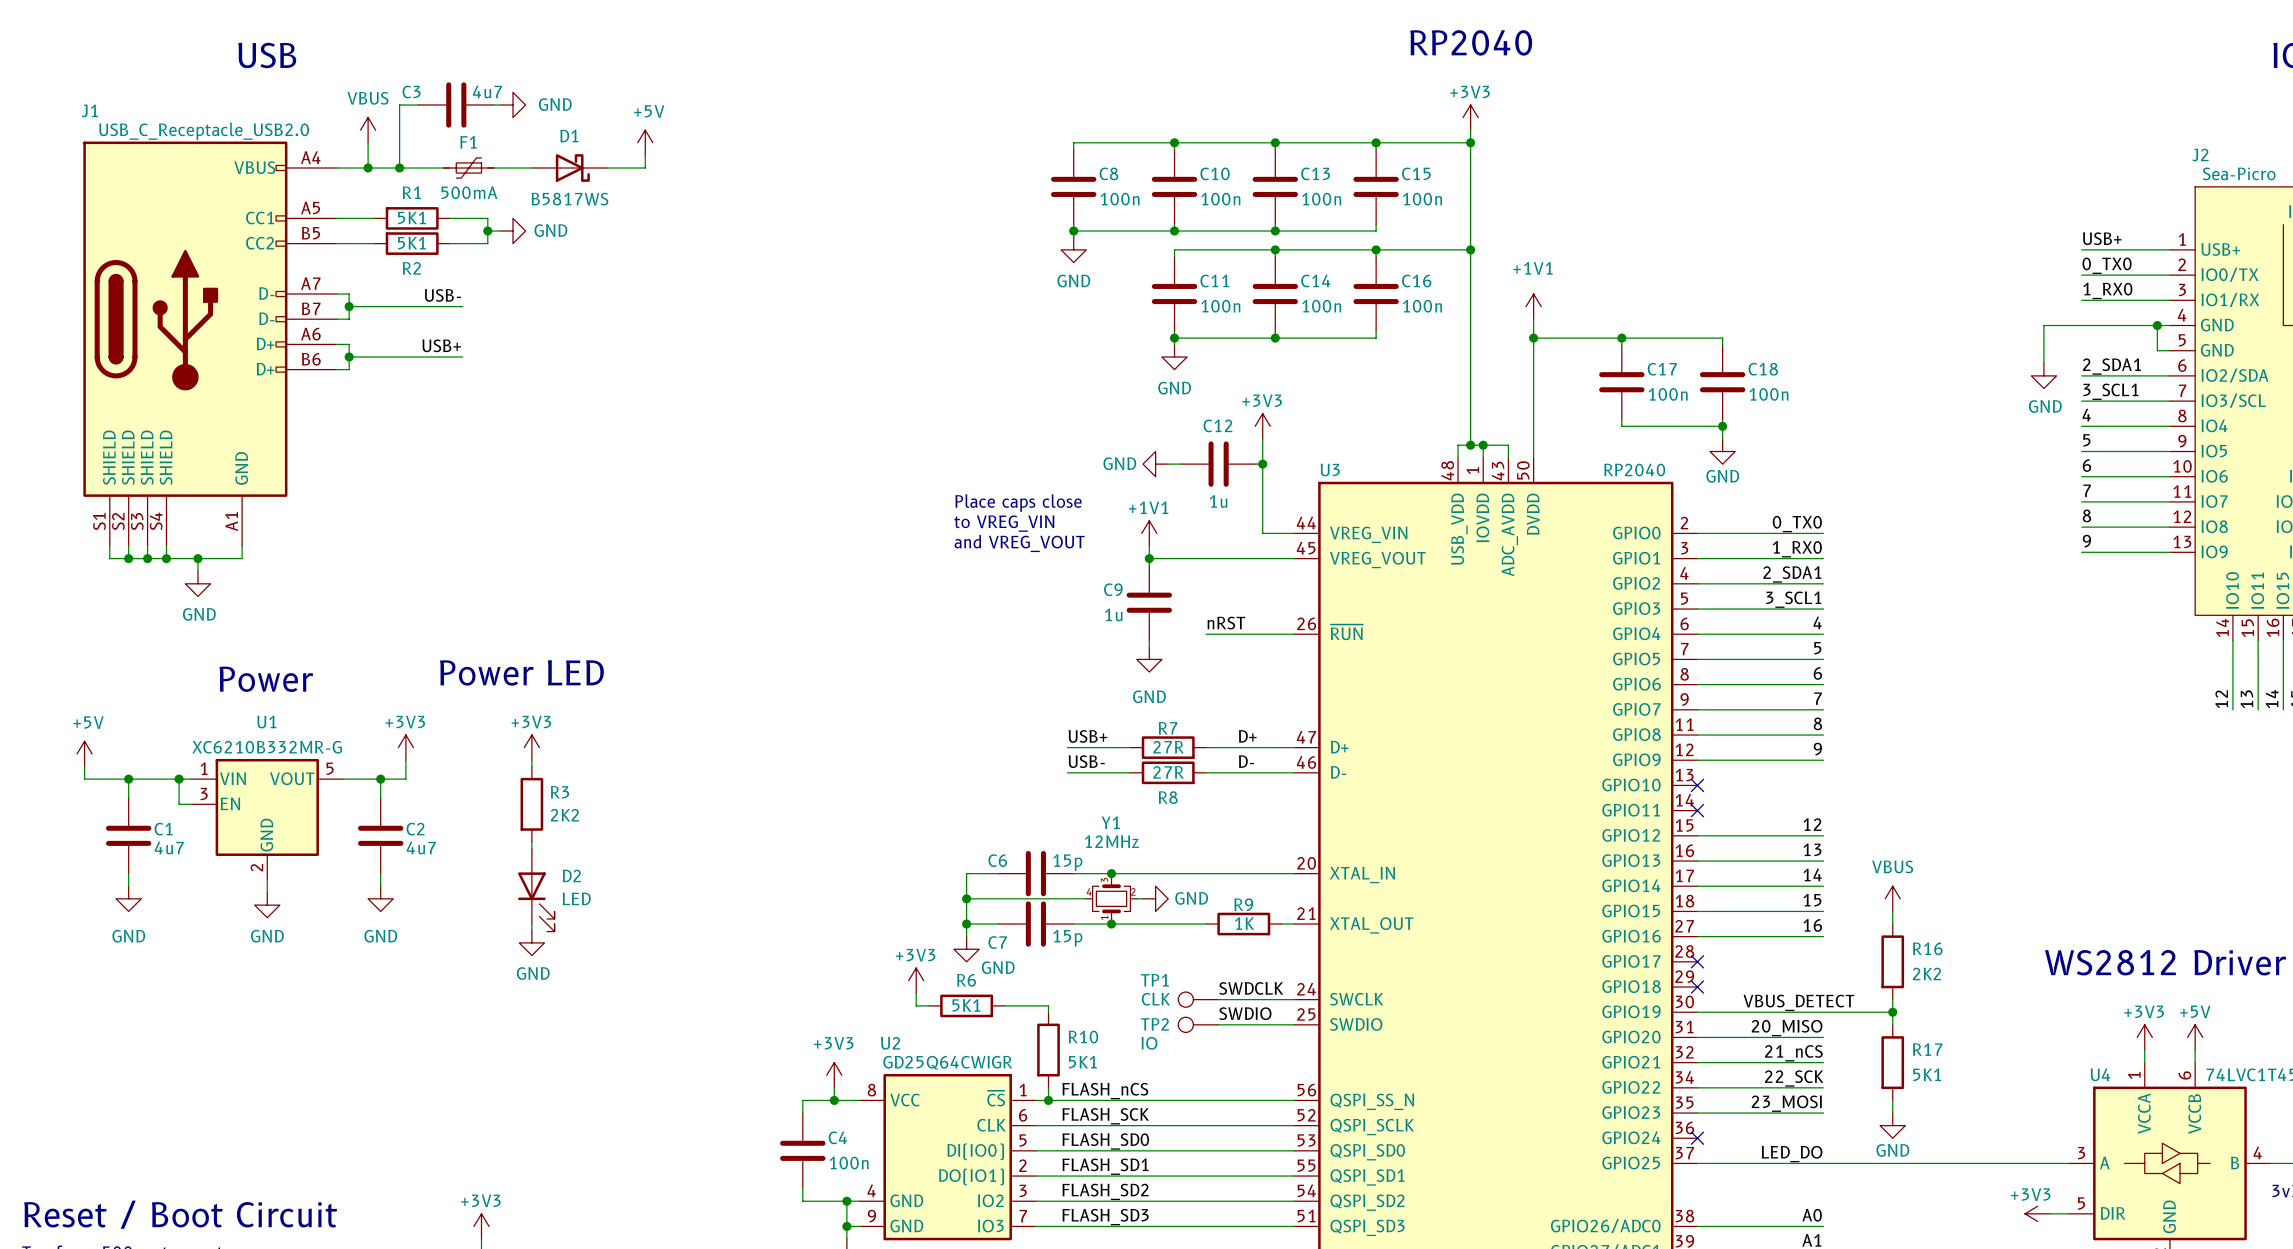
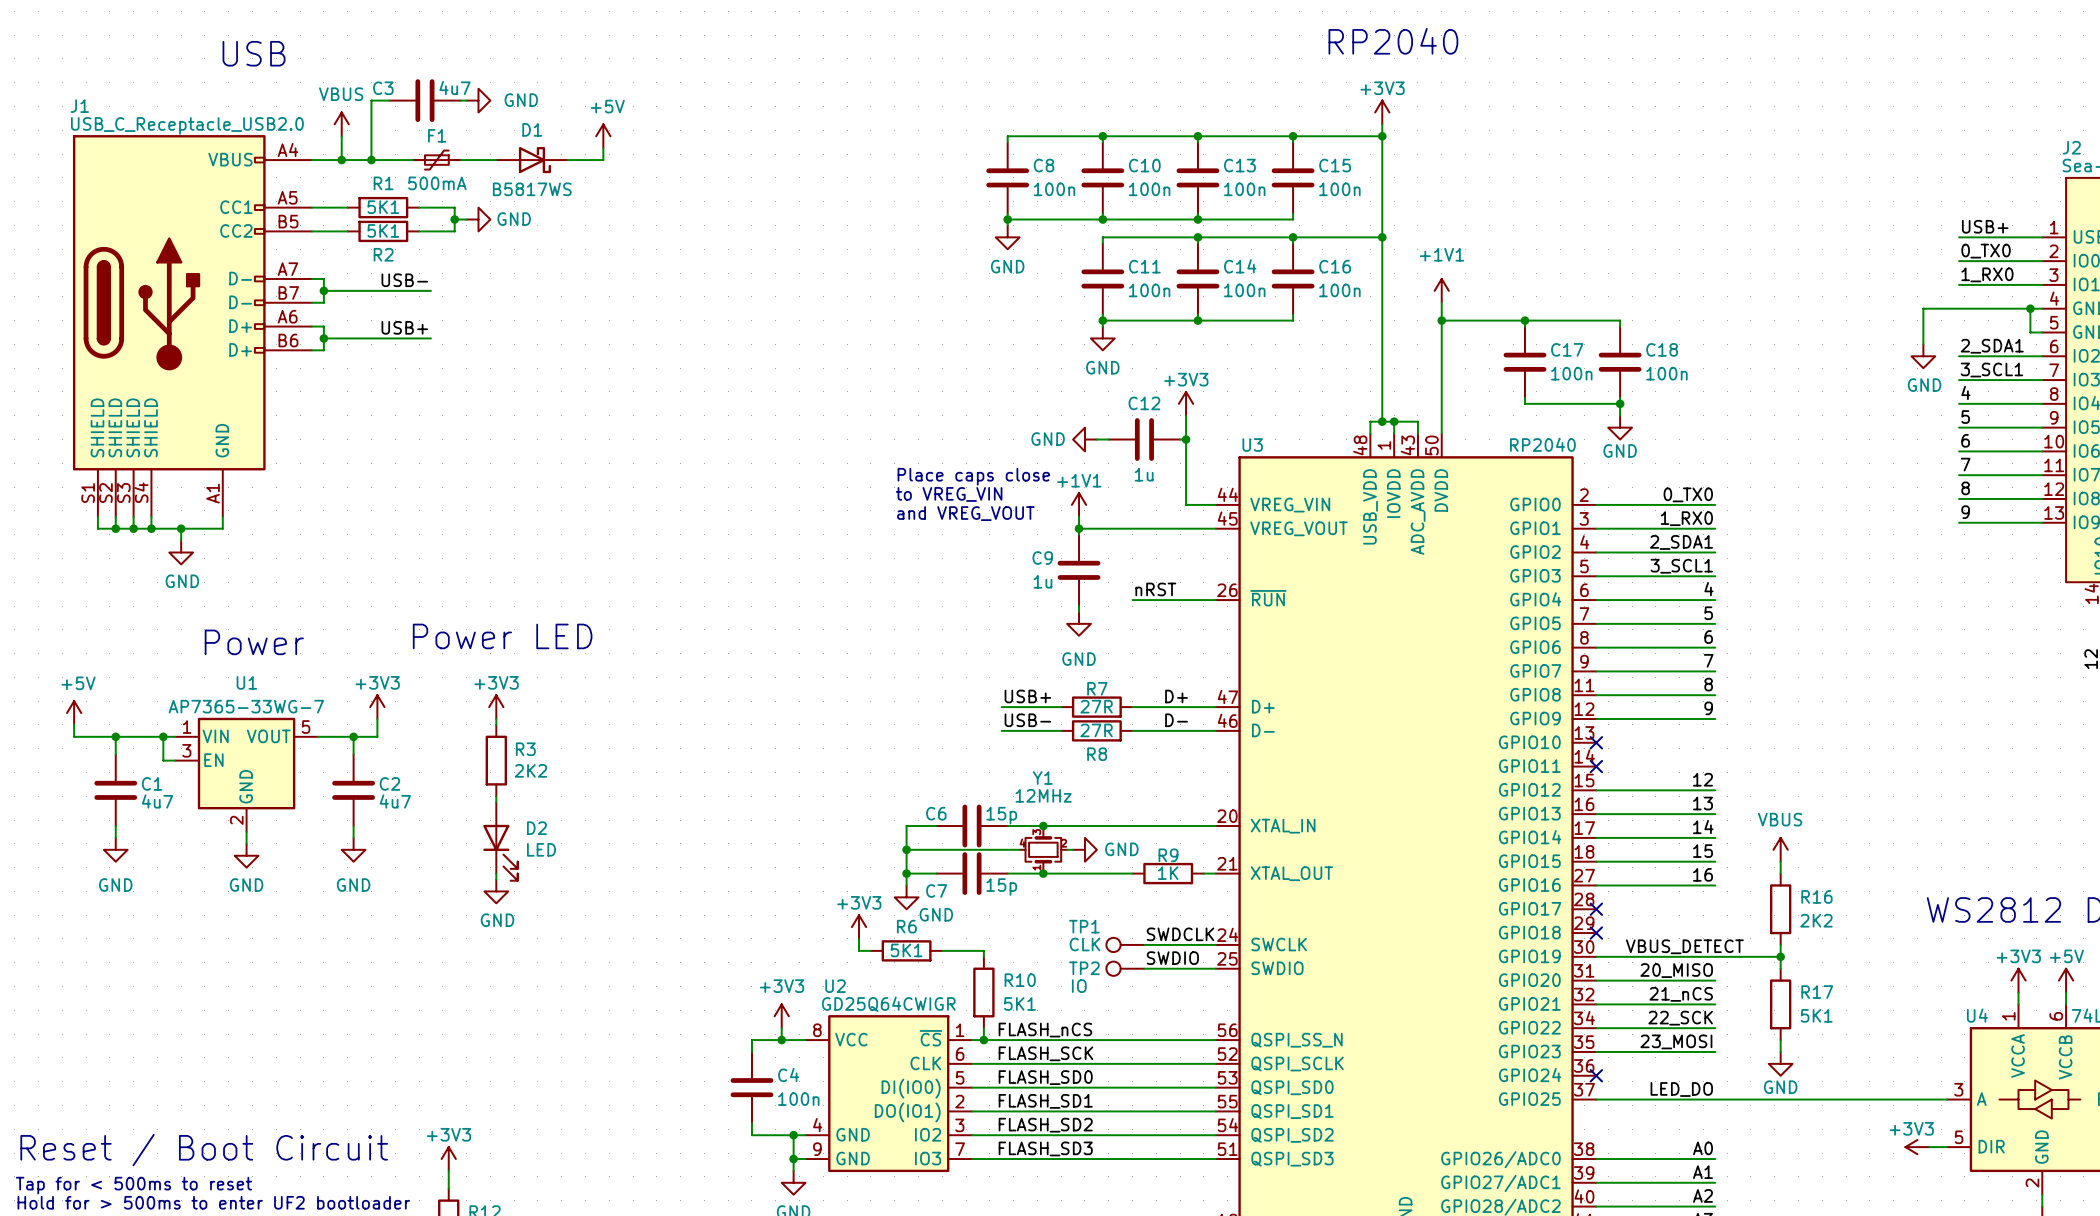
U1 value: XC6210B332MR-G (267, 747) -> AP7365-33WG-7 (246, 706)

